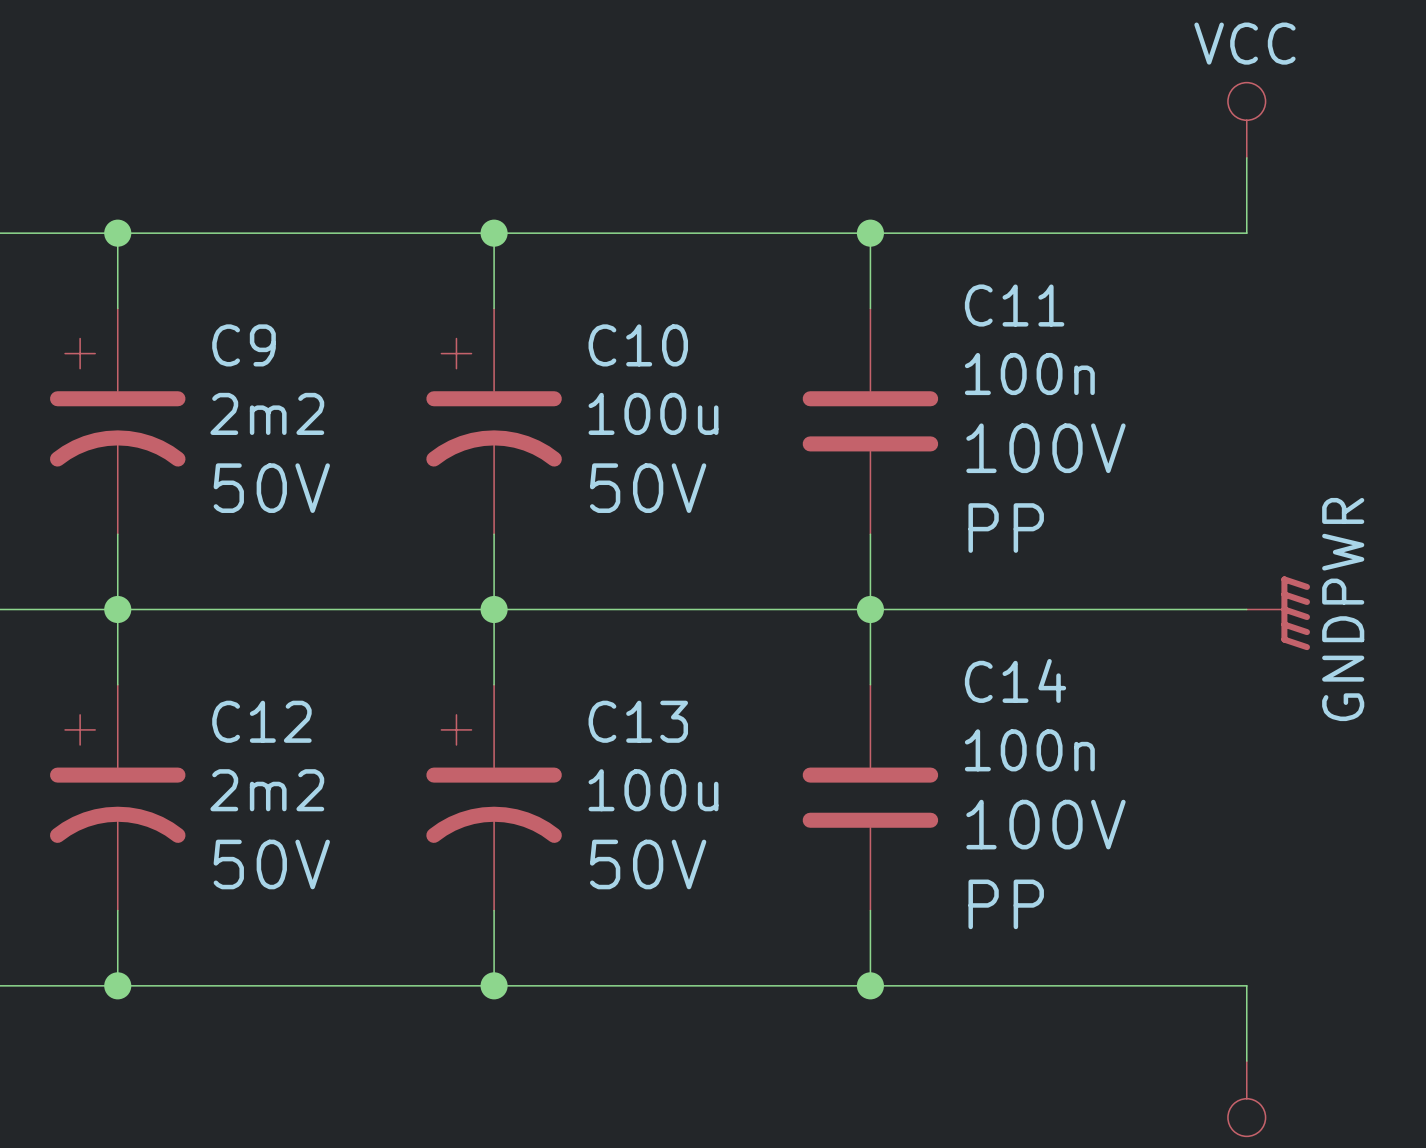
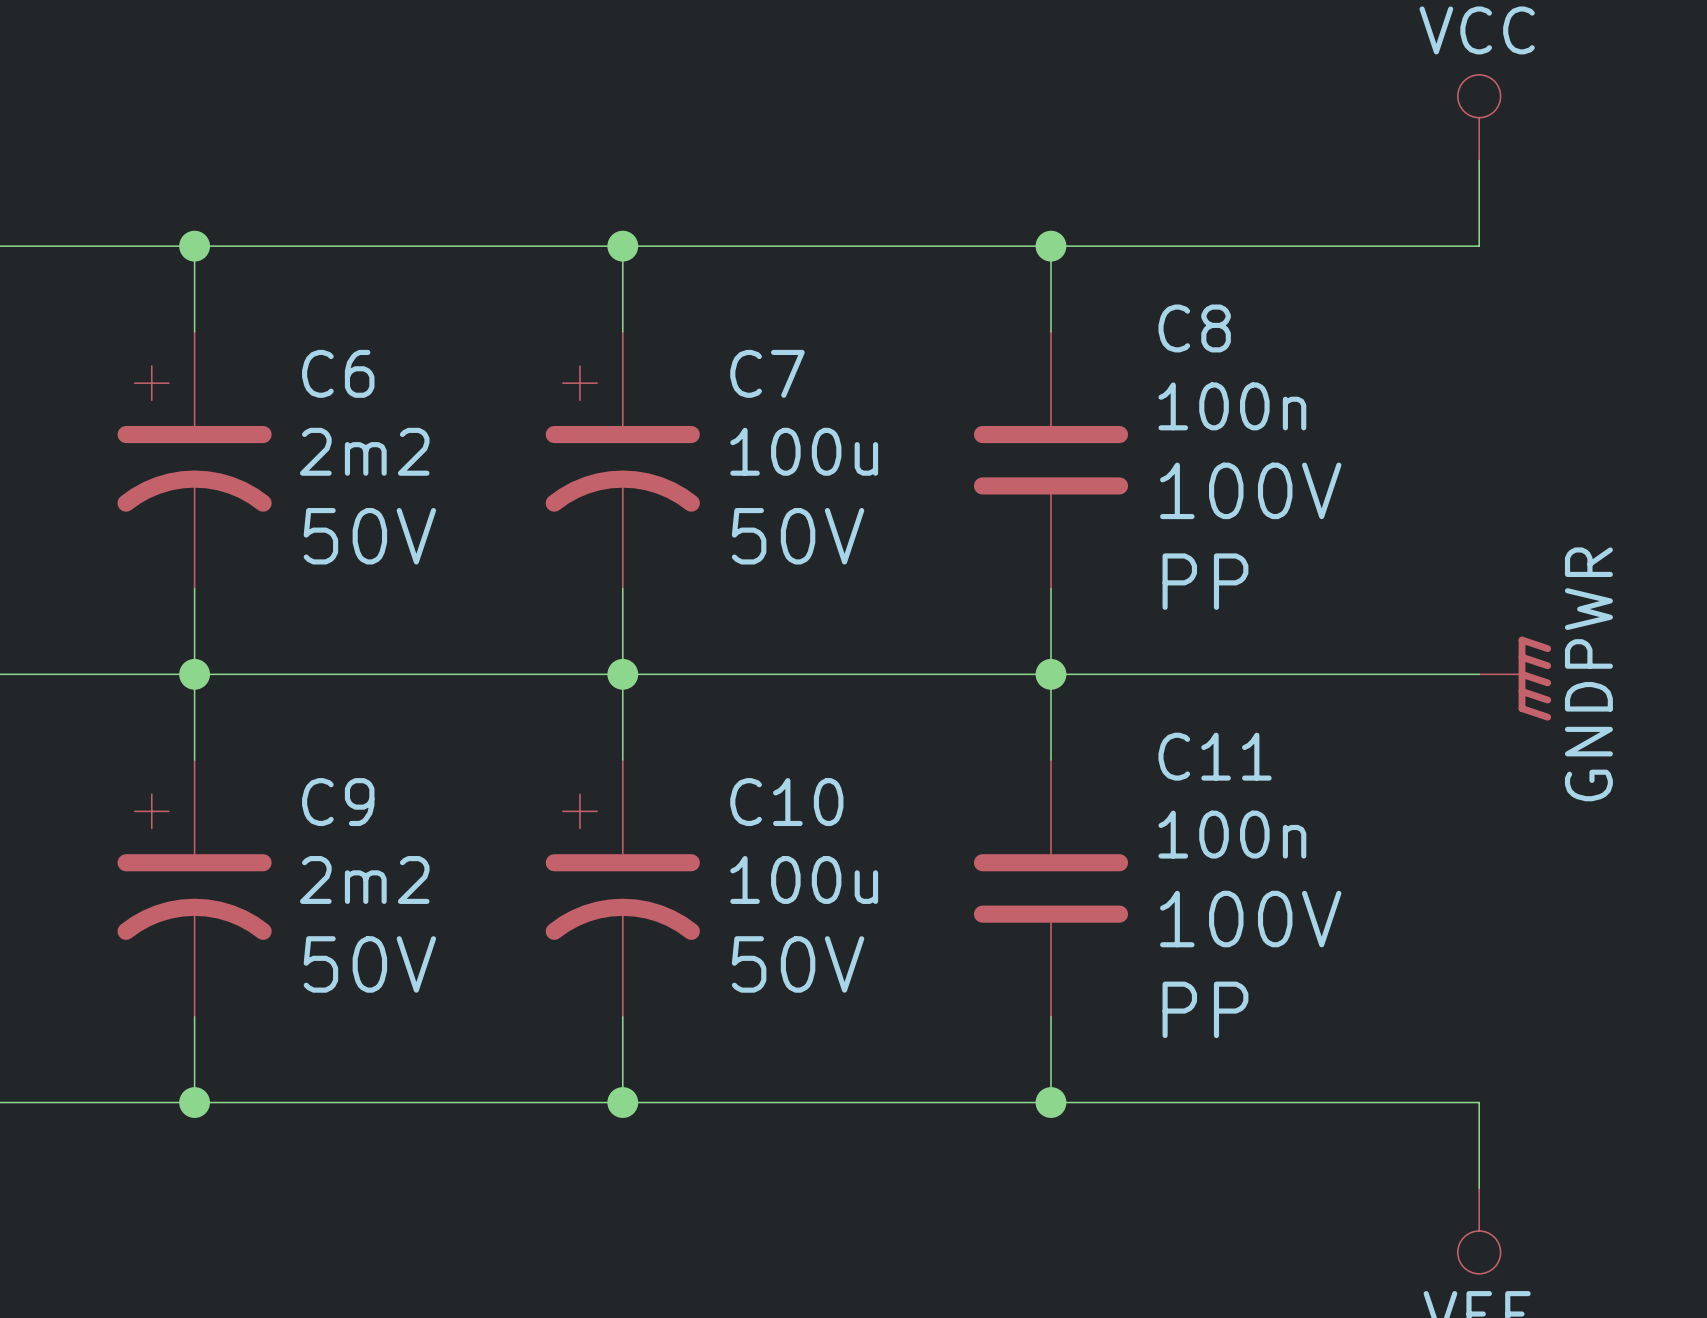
C11 name: C11 (1014, 305) -> C8 (1194, 328)
C9 name: C9 (244, 345) -> C6 (338, 373)
C10 name: C10 (638, 345) -> C7 (767, 373)
C14 name: C14 (1015, 680) -> C11 (1215, 756)
C12 name: C12 (261, 721) -> C9 (338, 802)
C13 name: C13 (638, 721) -> C10 (786, 802)

